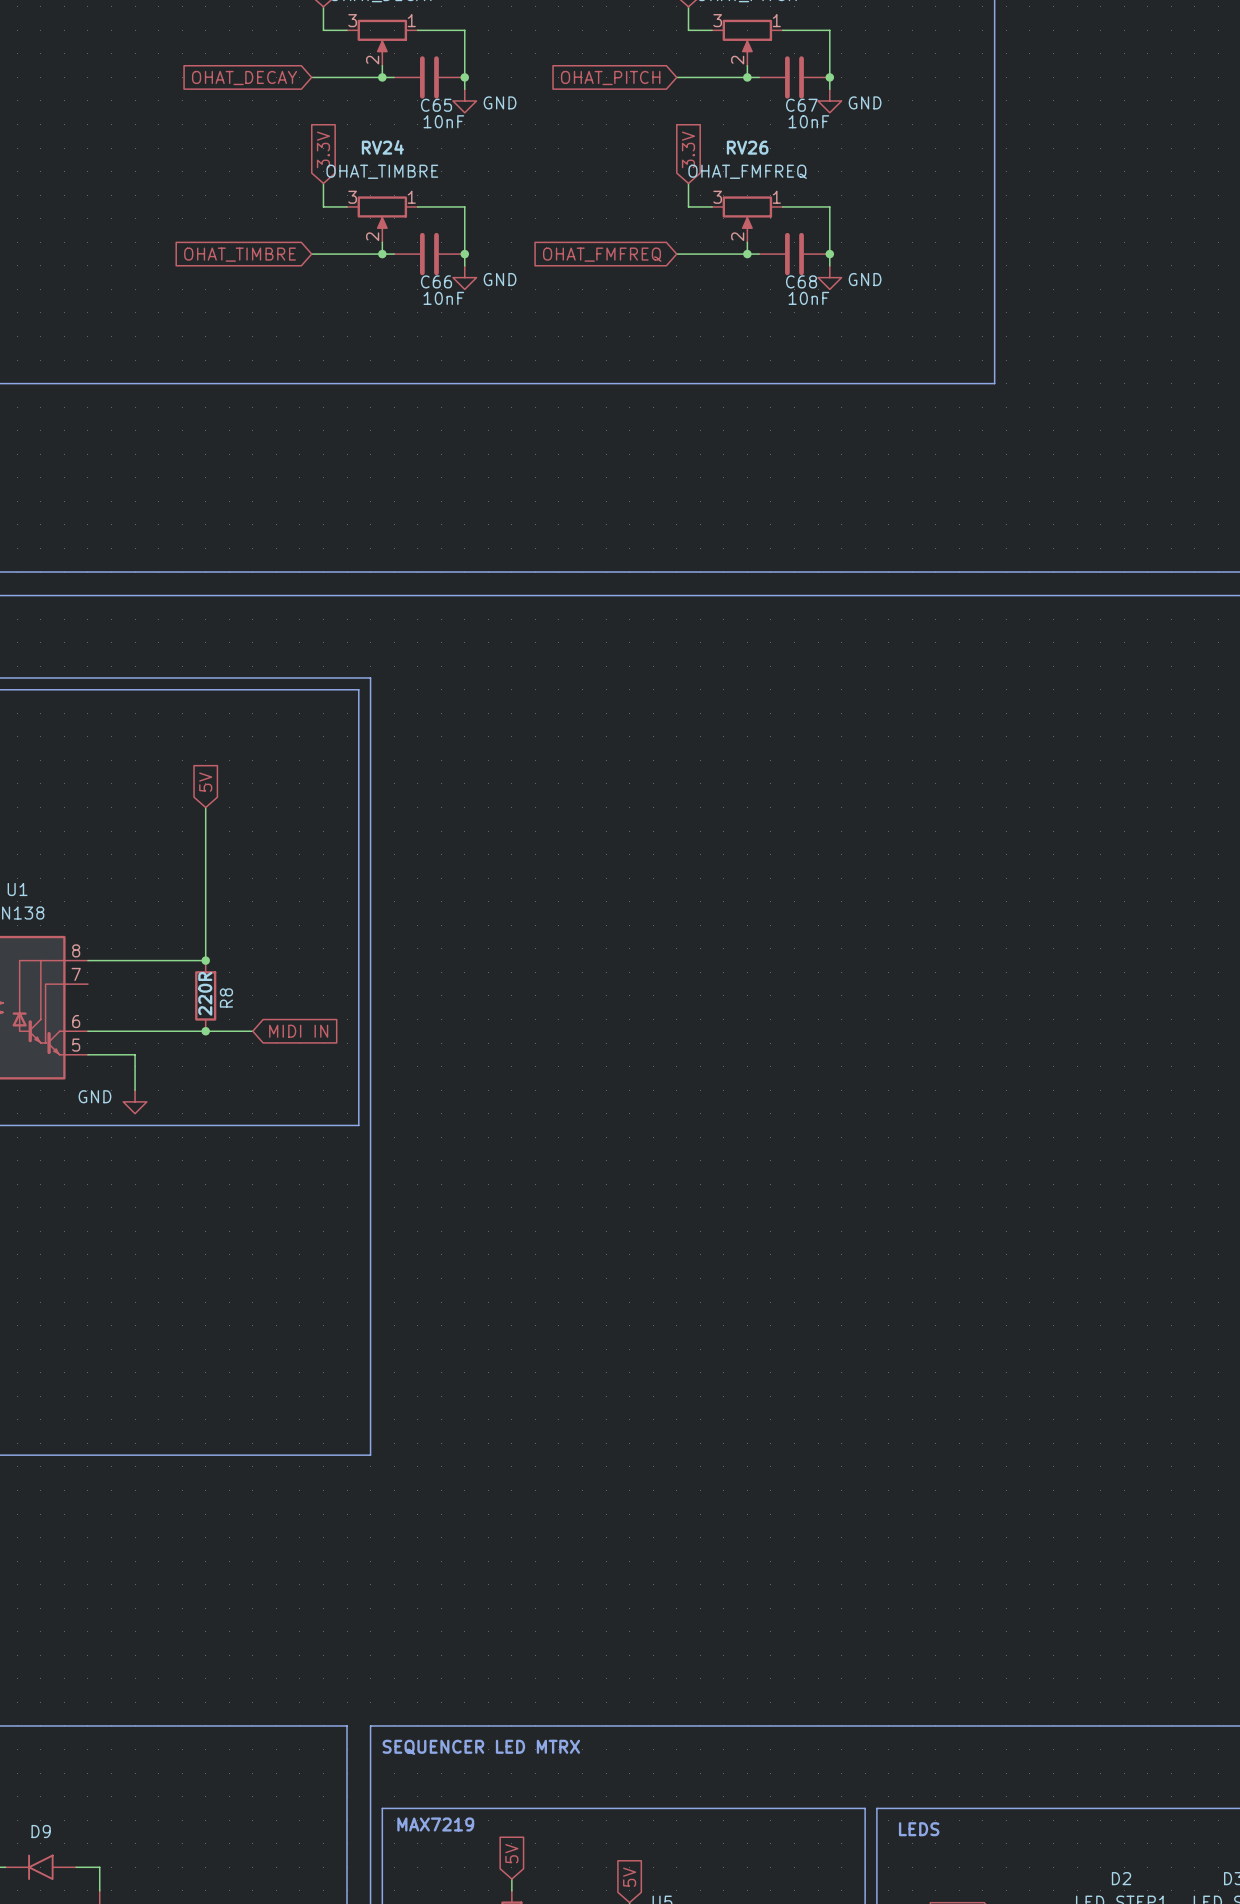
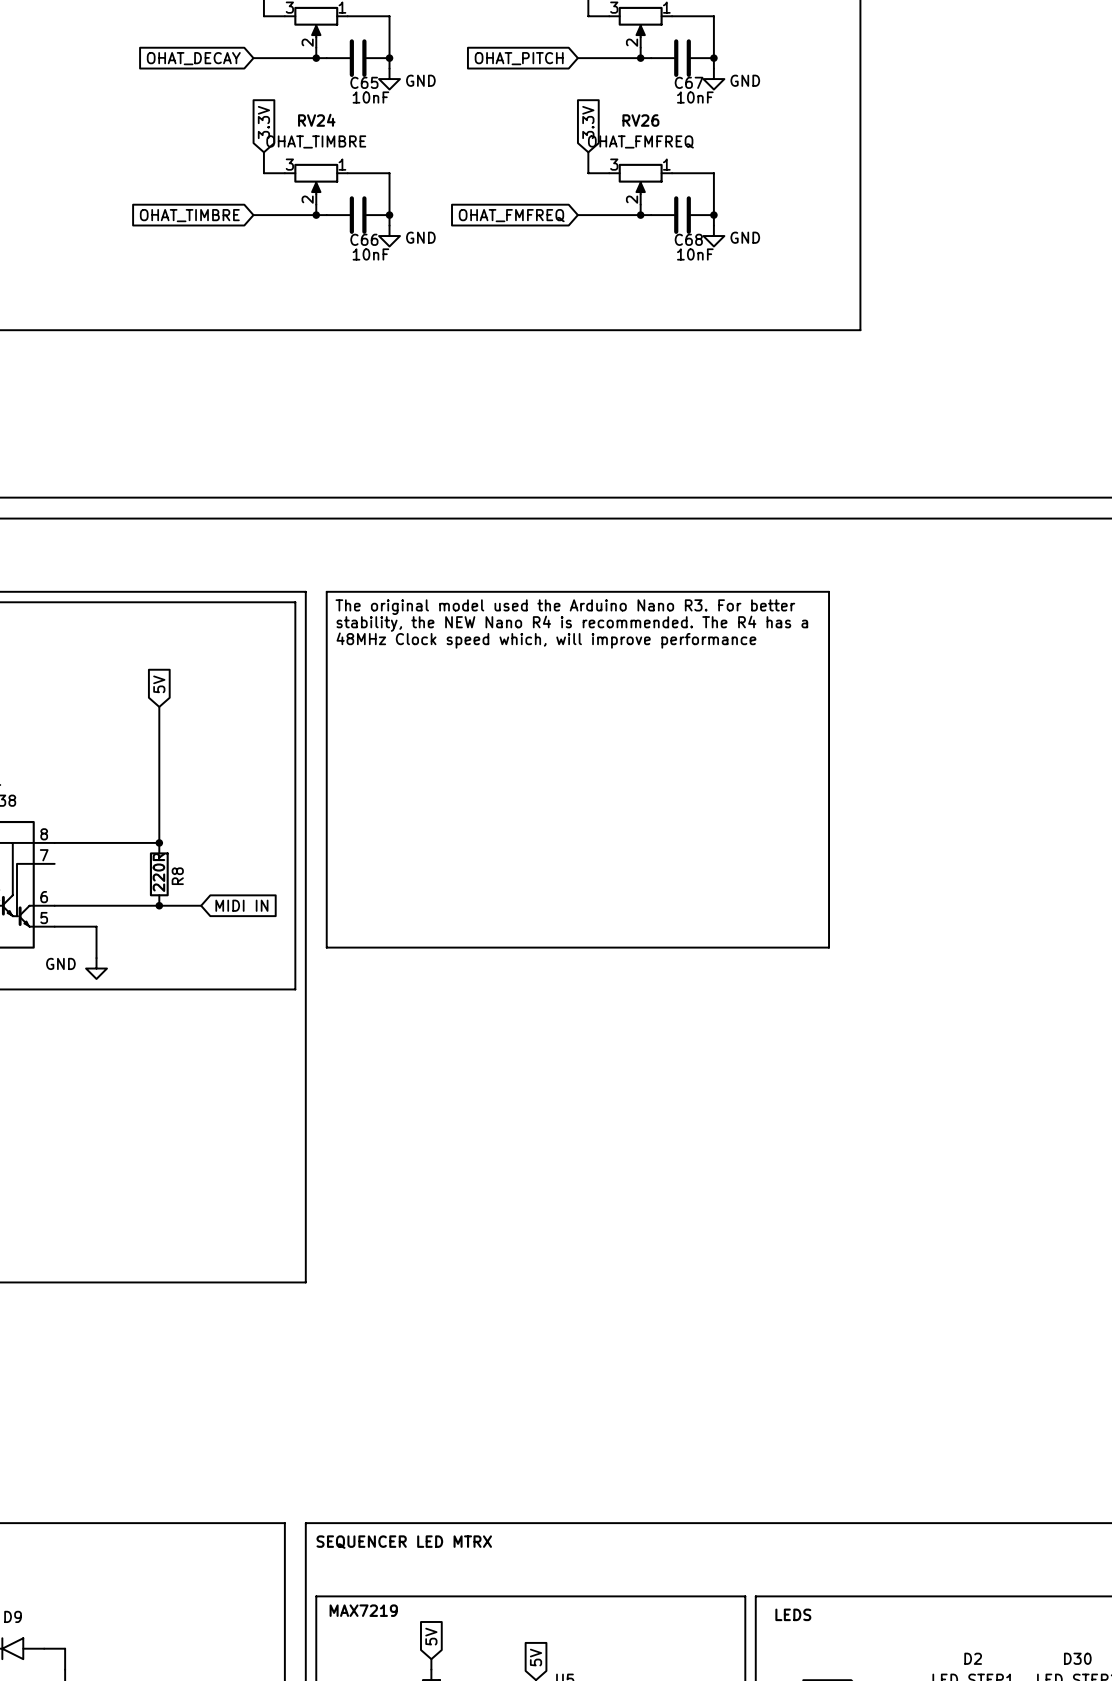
line: none -> (326, 591) (829, 591) (829, 947) (326, 947) (326, 591)
text: none -> The original model used the Arduino Nano R3. For better (565, 607)
text: none -> stability, the NEW Nano R4 is recommended. The R4 has a (572, 623)
text: none -> 48MHz Clock speed which, will improve performance (546, 640)

